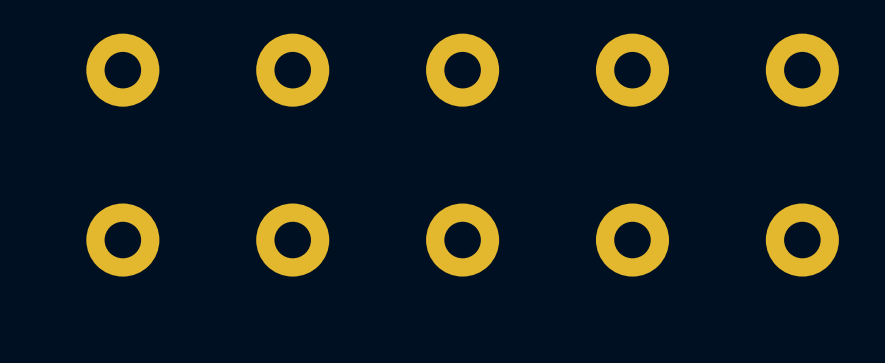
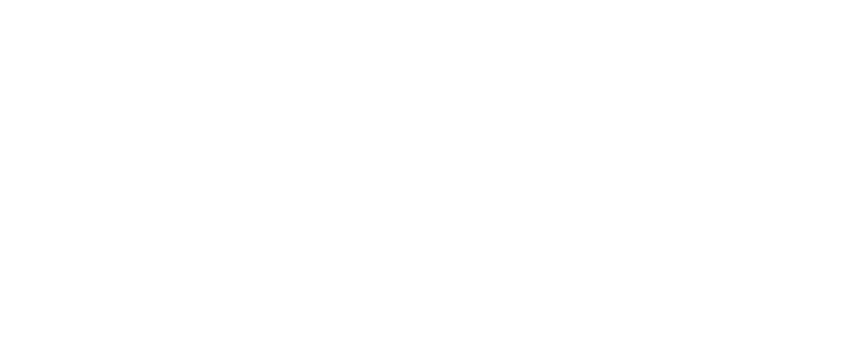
part: (122, 70) -> none
part: (292, 70) -> none
part: (462, 70) -> none
part: (632, 70) -> none
part: (802, 70) -> none
part: (122, 240) -> none
part: (292, 240) -> none
part: (462, 240) -> none
part: (632, 240) -> none
part: (802, 240) -> none

